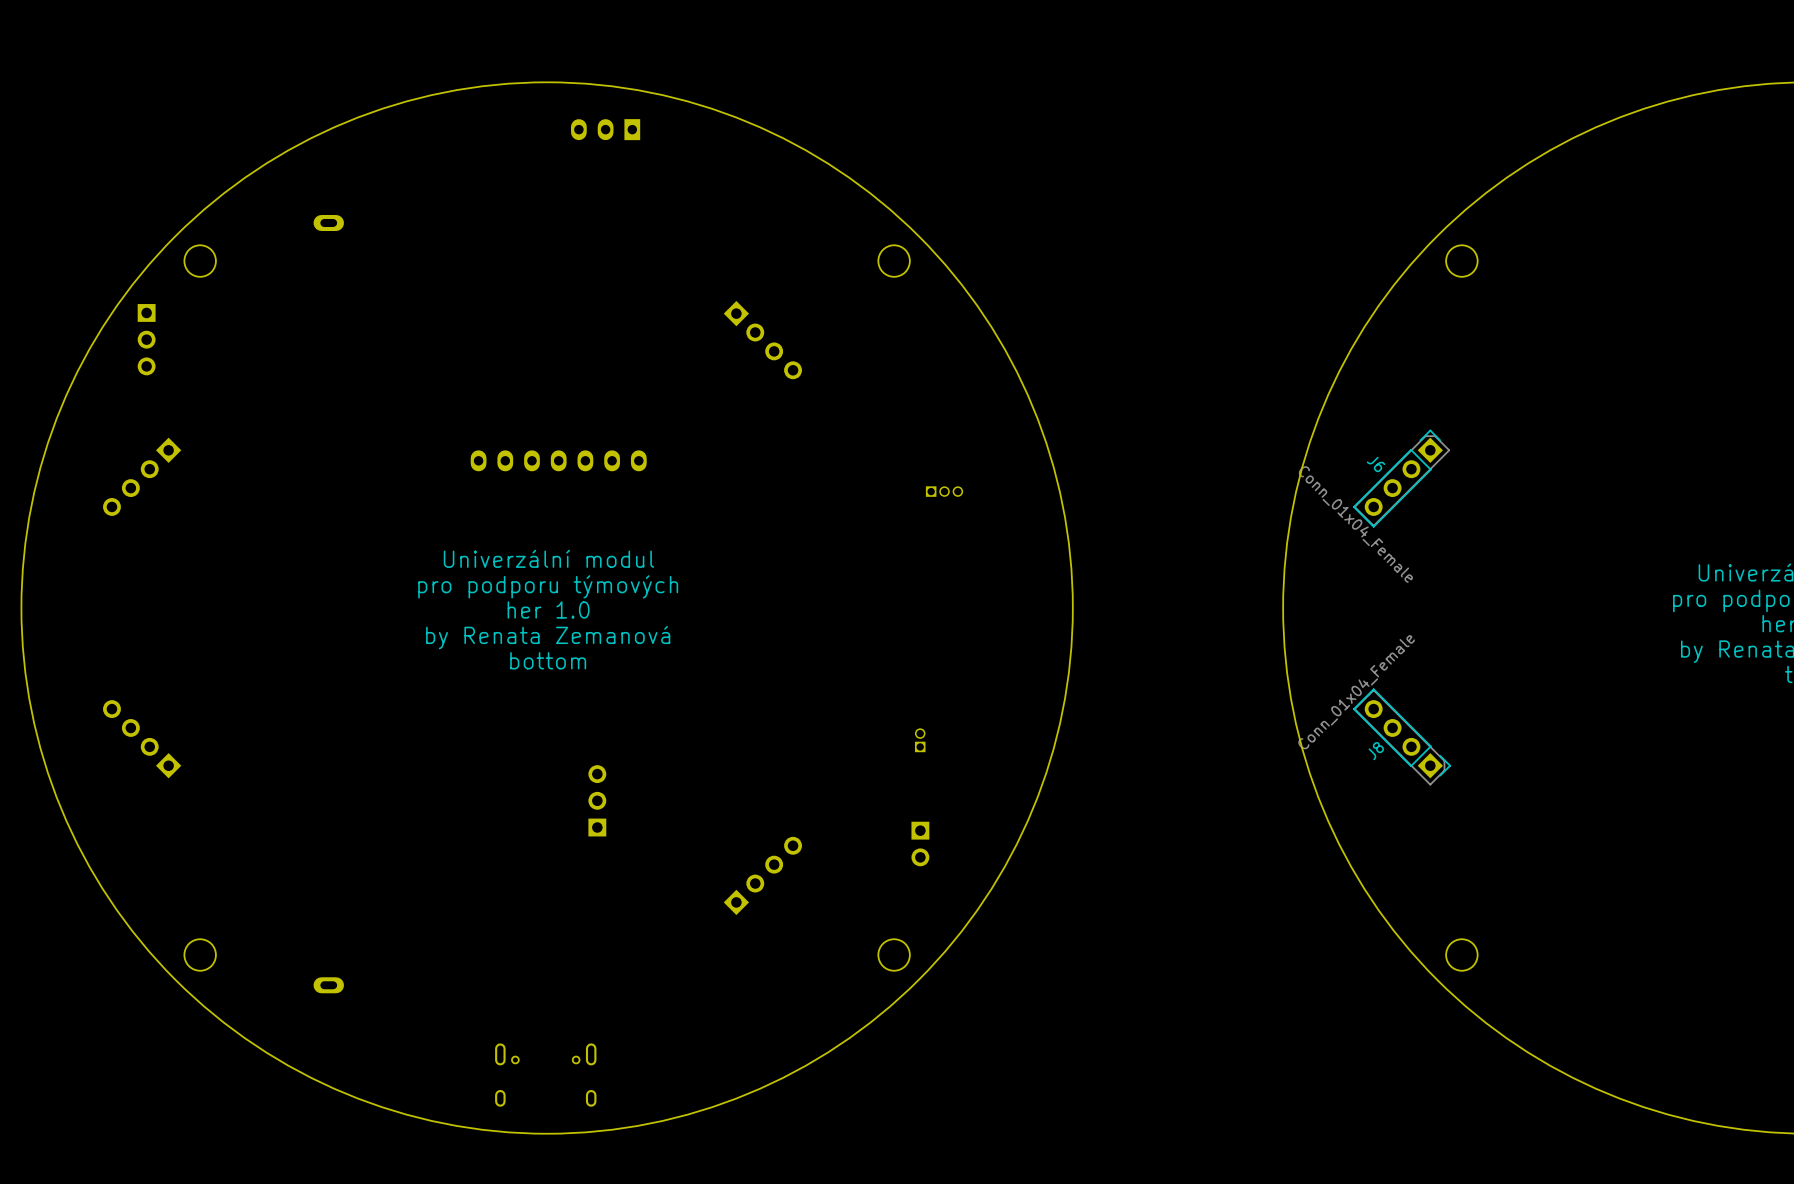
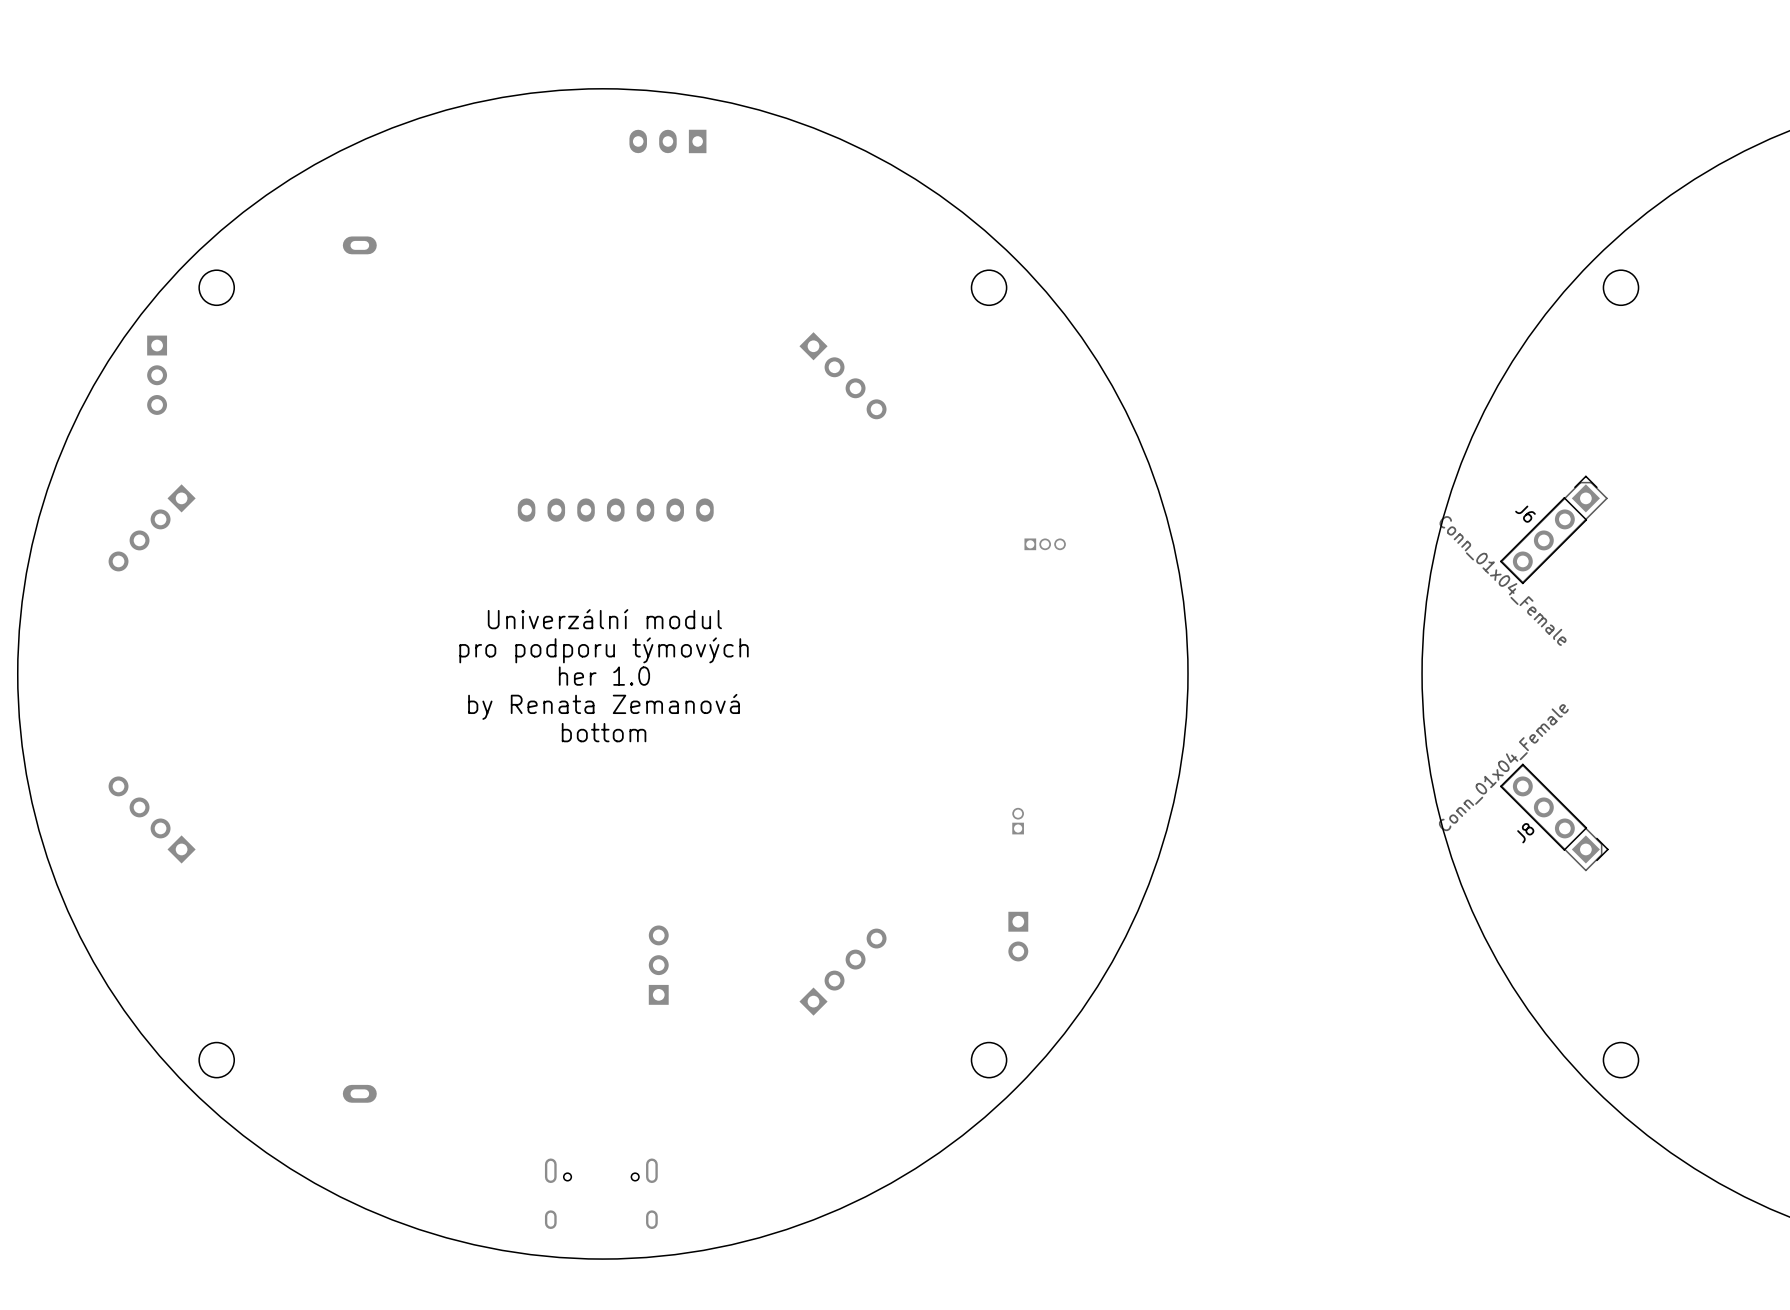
part position: (597, 800) -> (658, 965)

